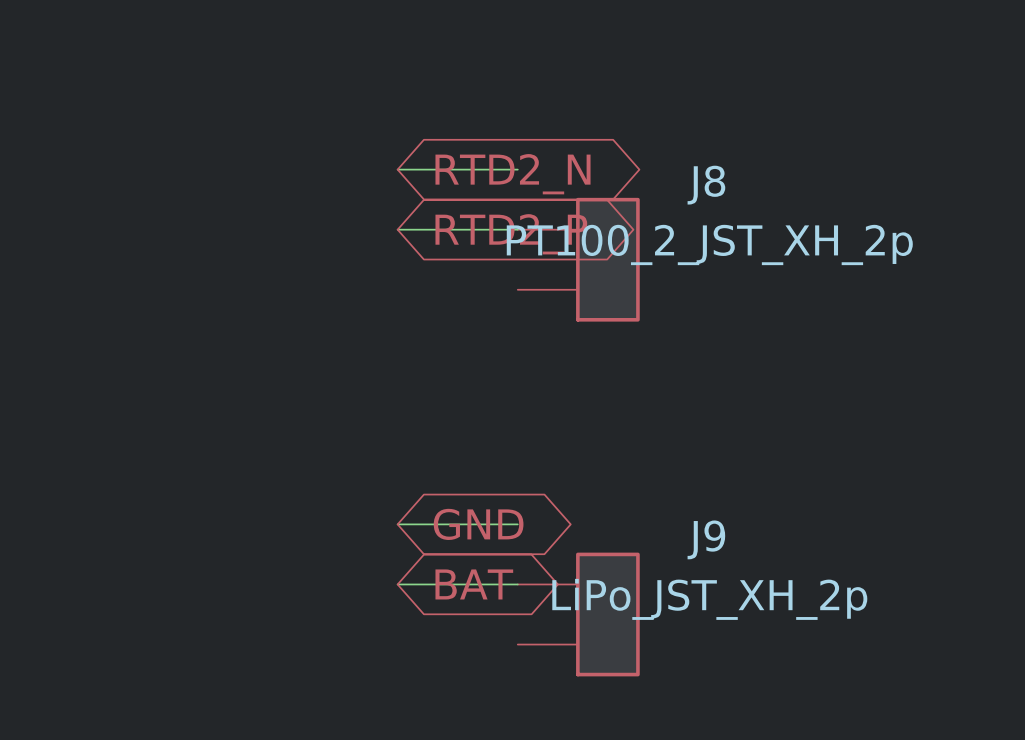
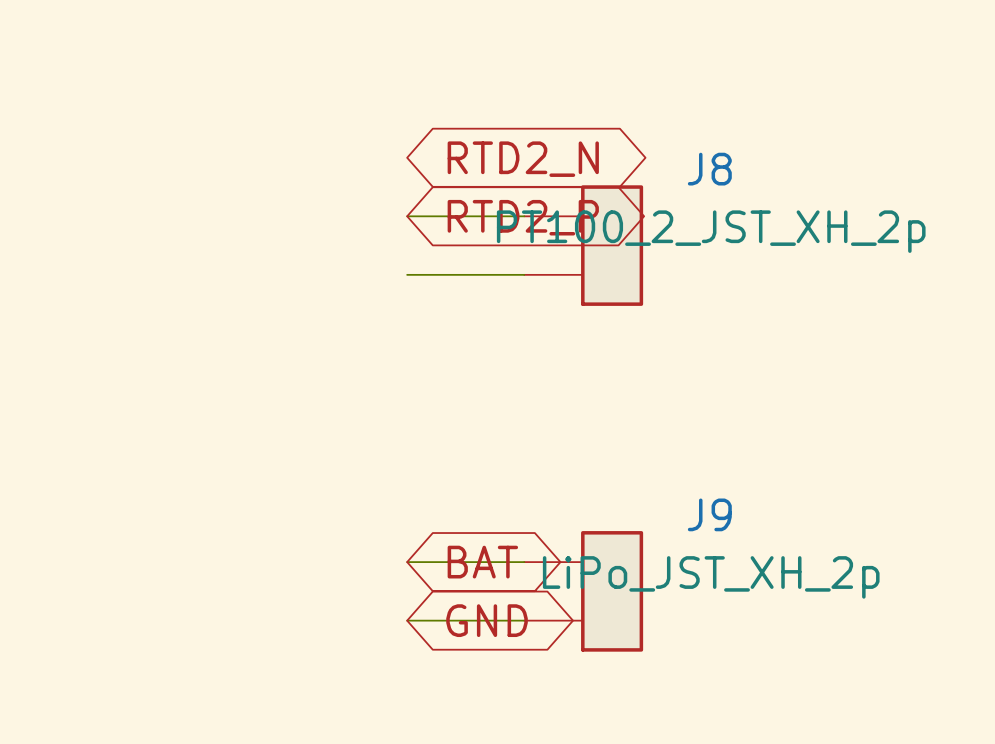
wire: (397, 169) (517, 169) -> (407, 274) (524, 274)
wire: (397, 524) (517, 524) -> (407, 620) (524, 620)
global label position: GND (478, 524) -> GND (487, 620)

